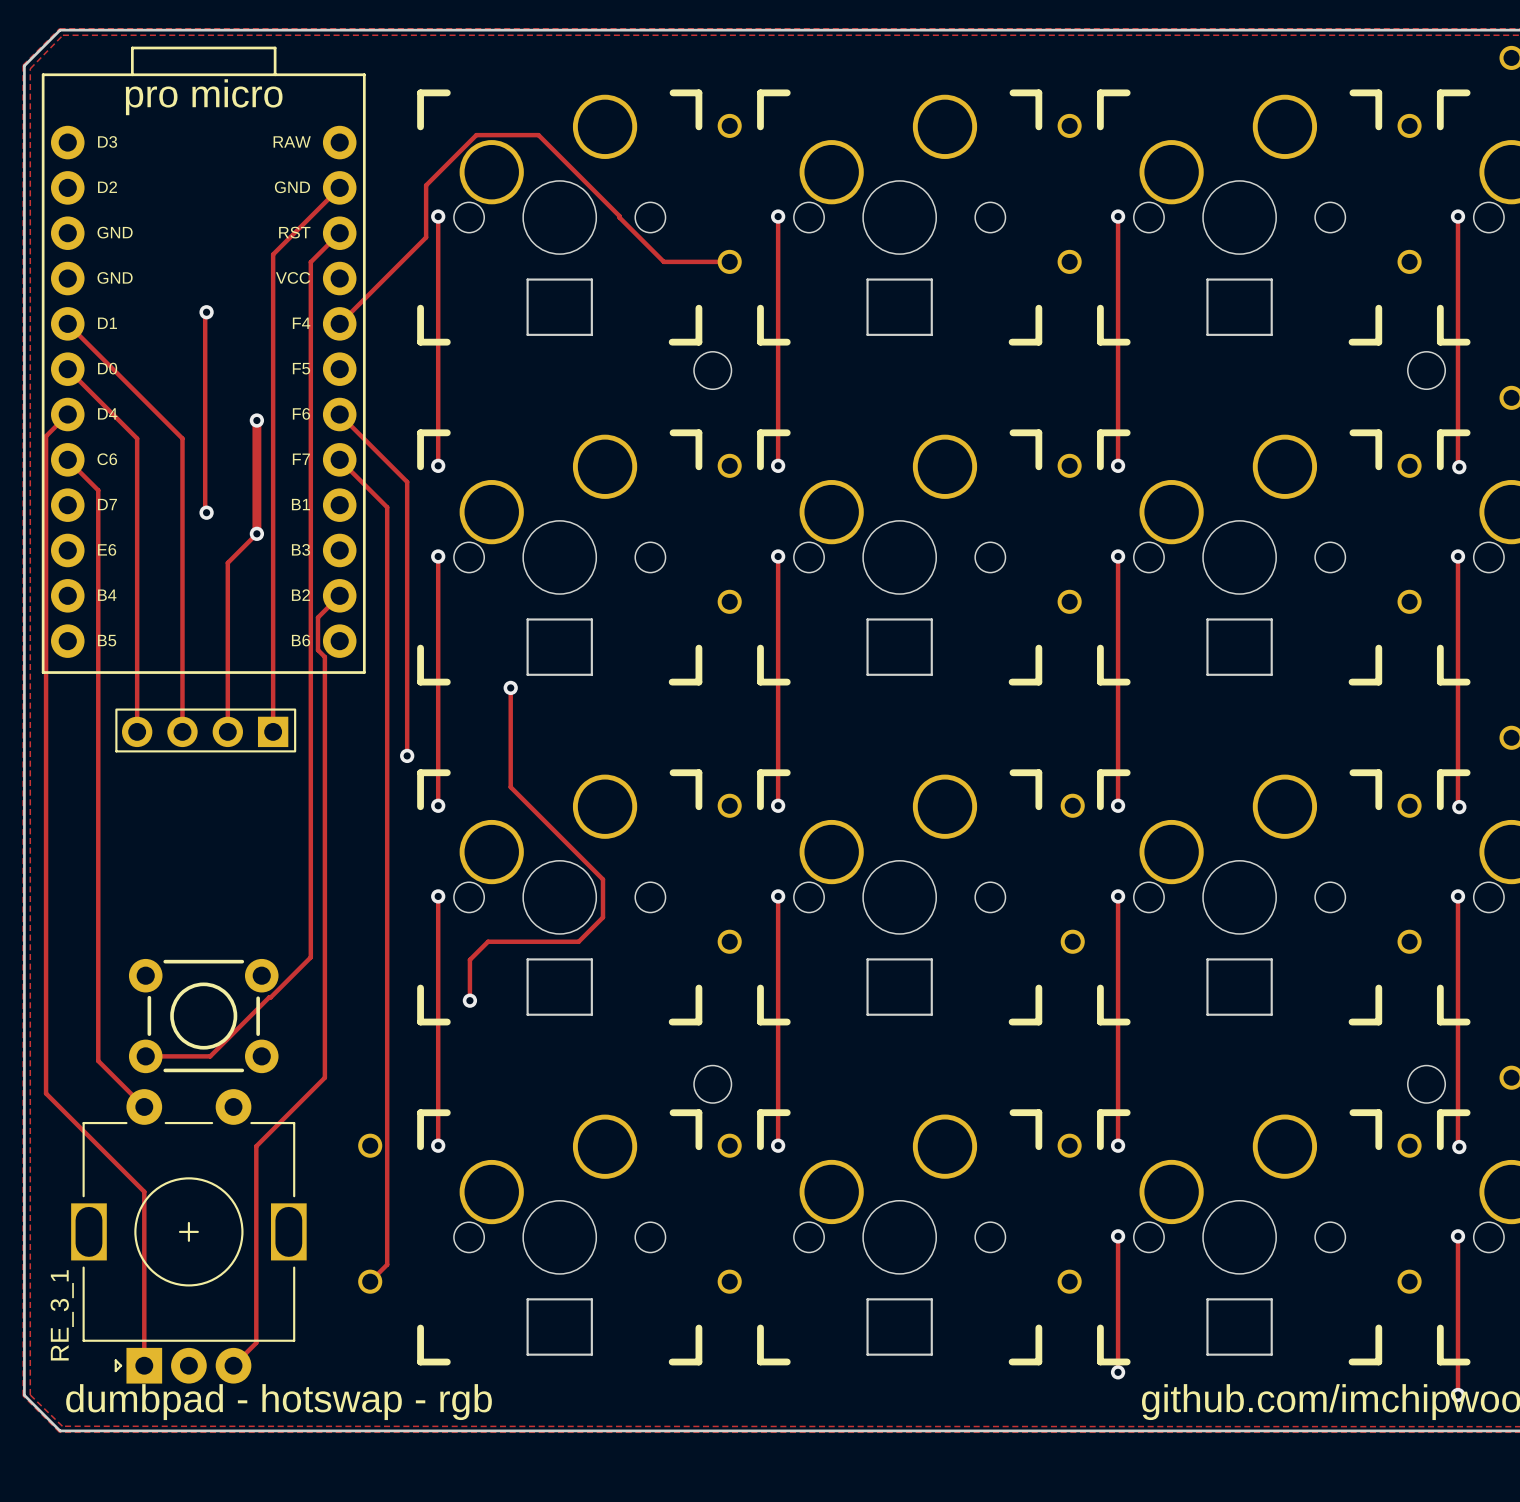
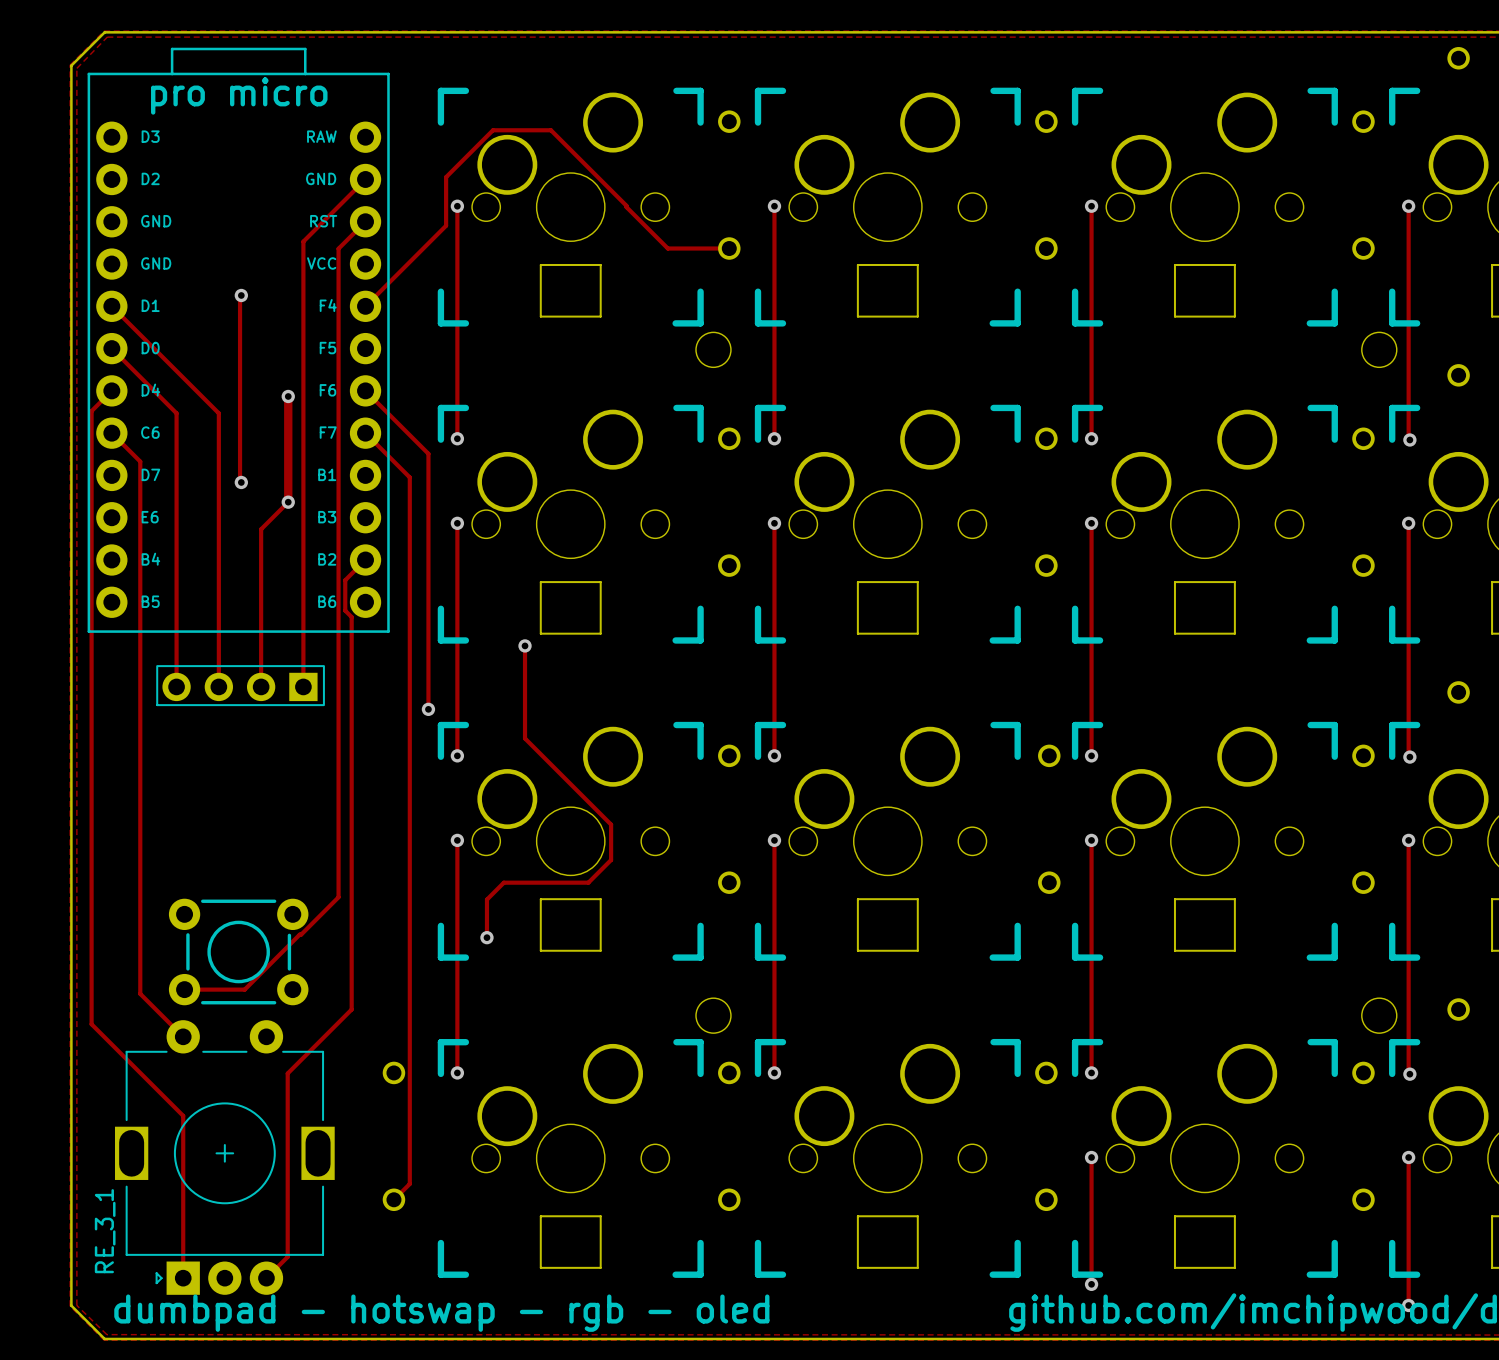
text: dumbpad - hotswap - rgb (279, 1402) -> dumbpad - hotswap - rgb - oled (441, 1313)

